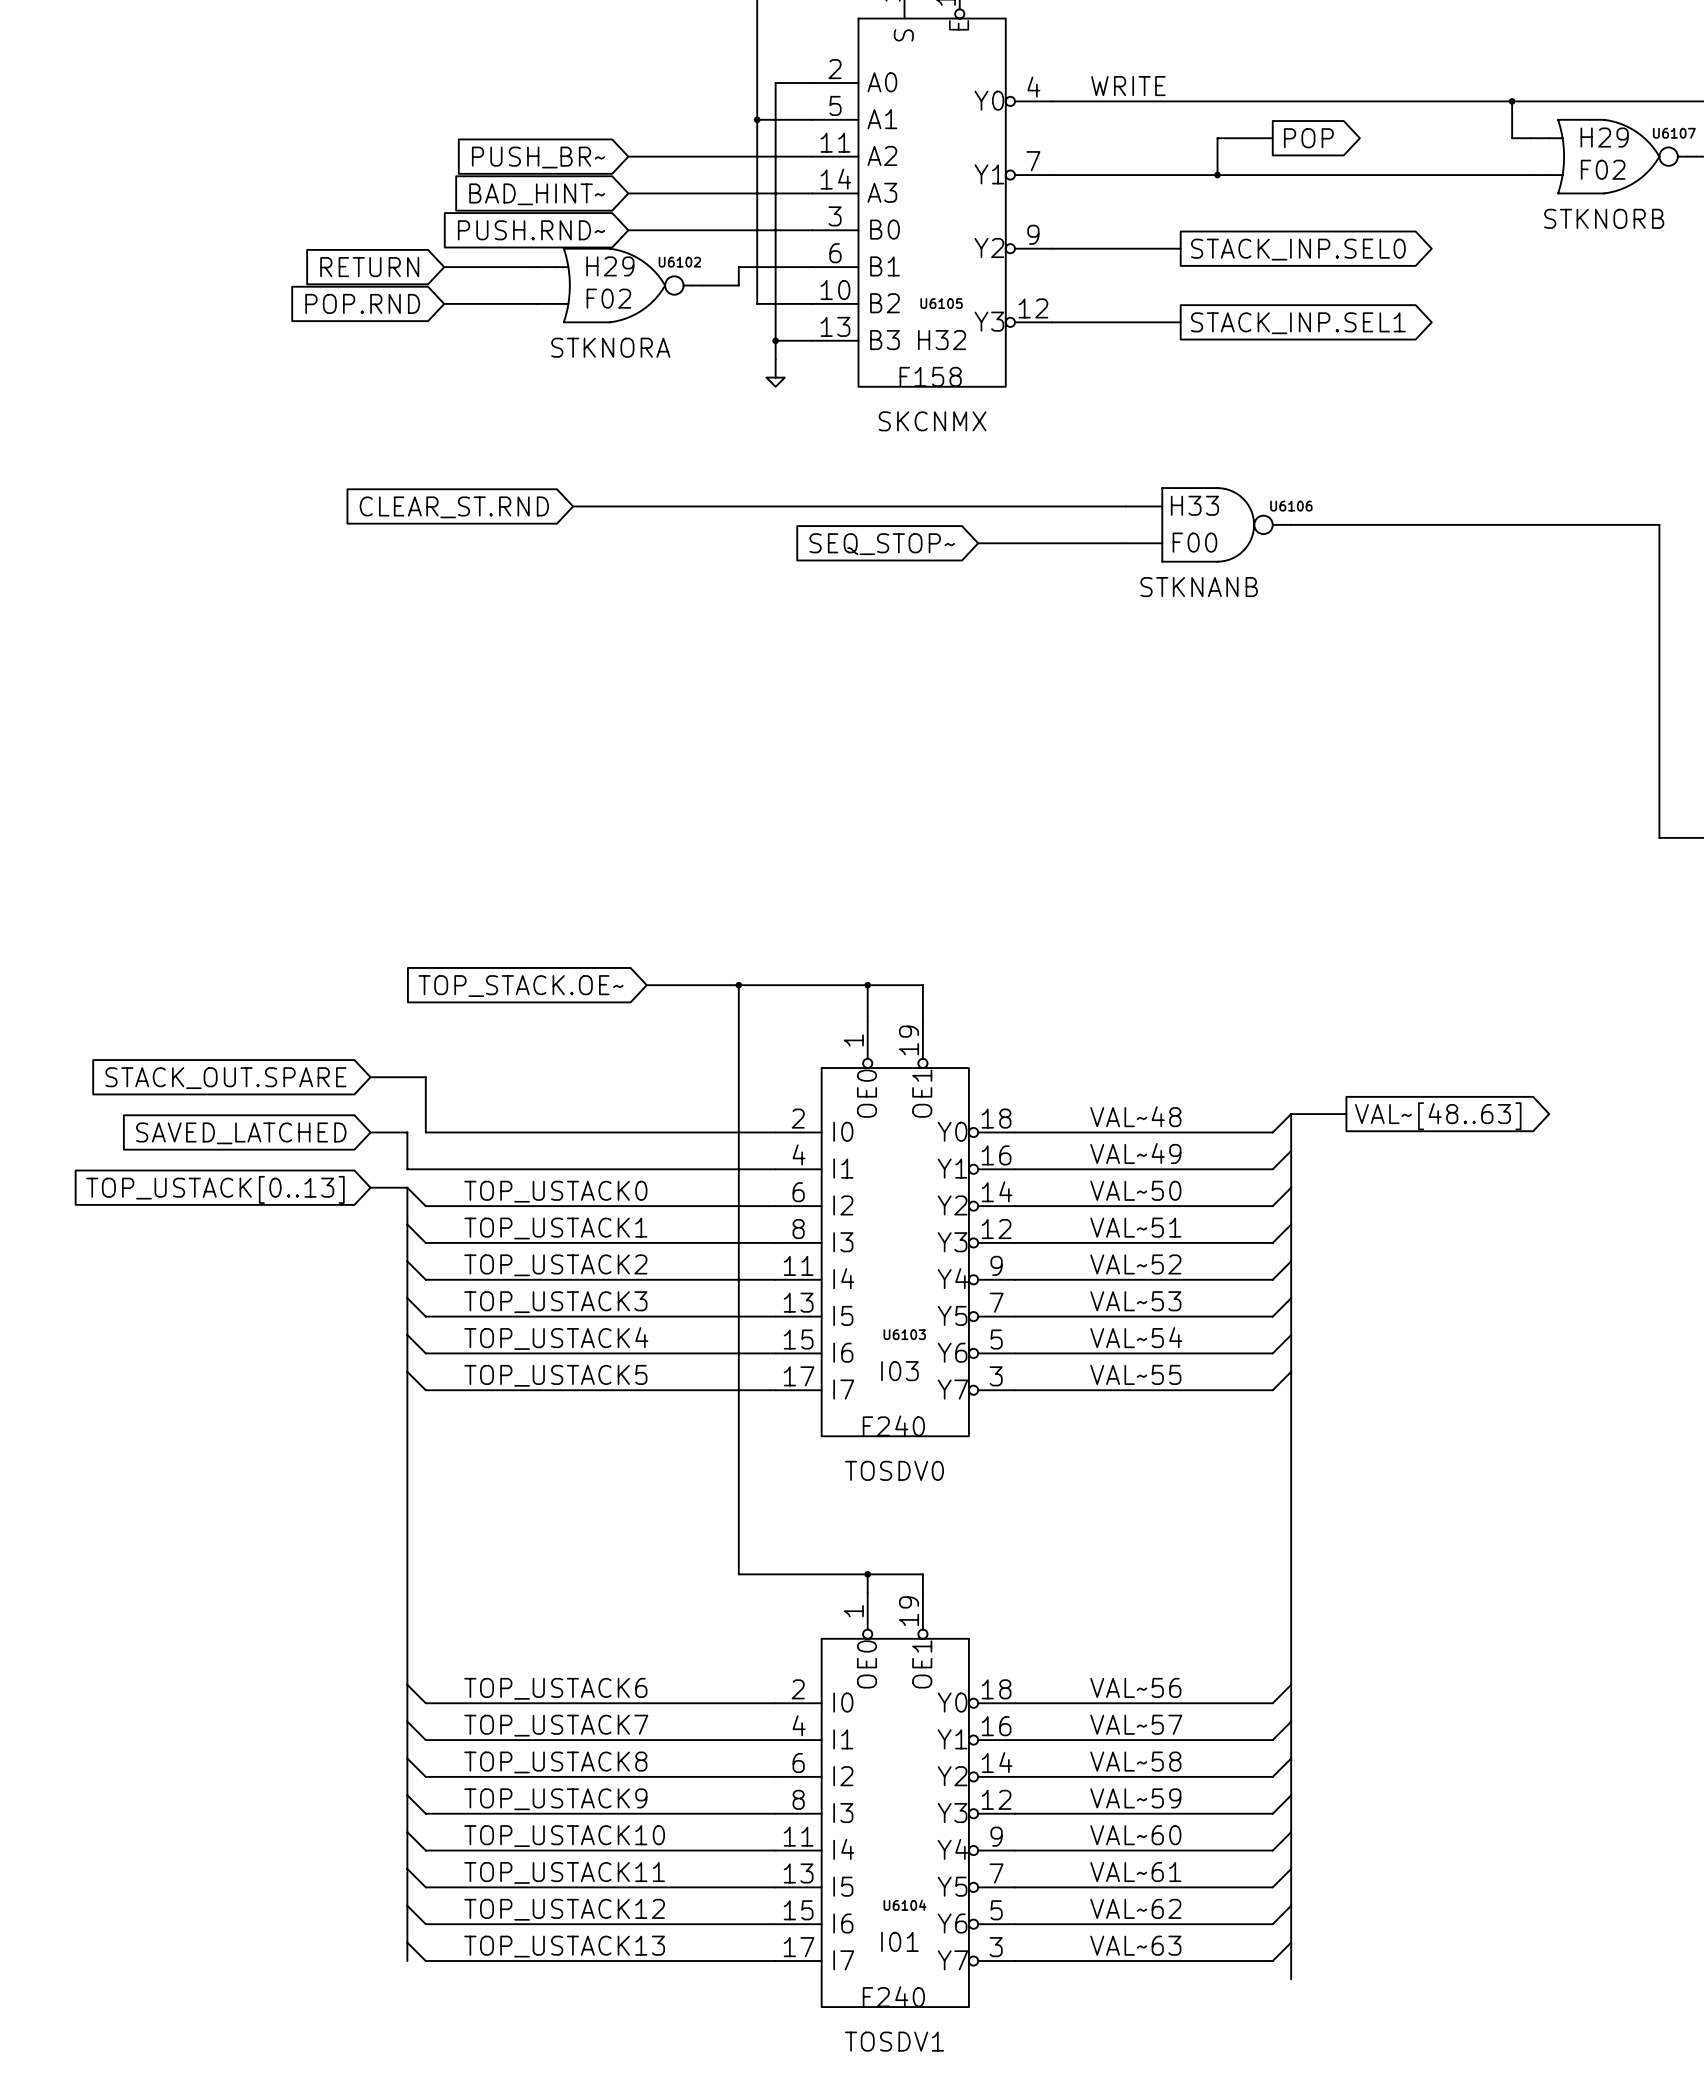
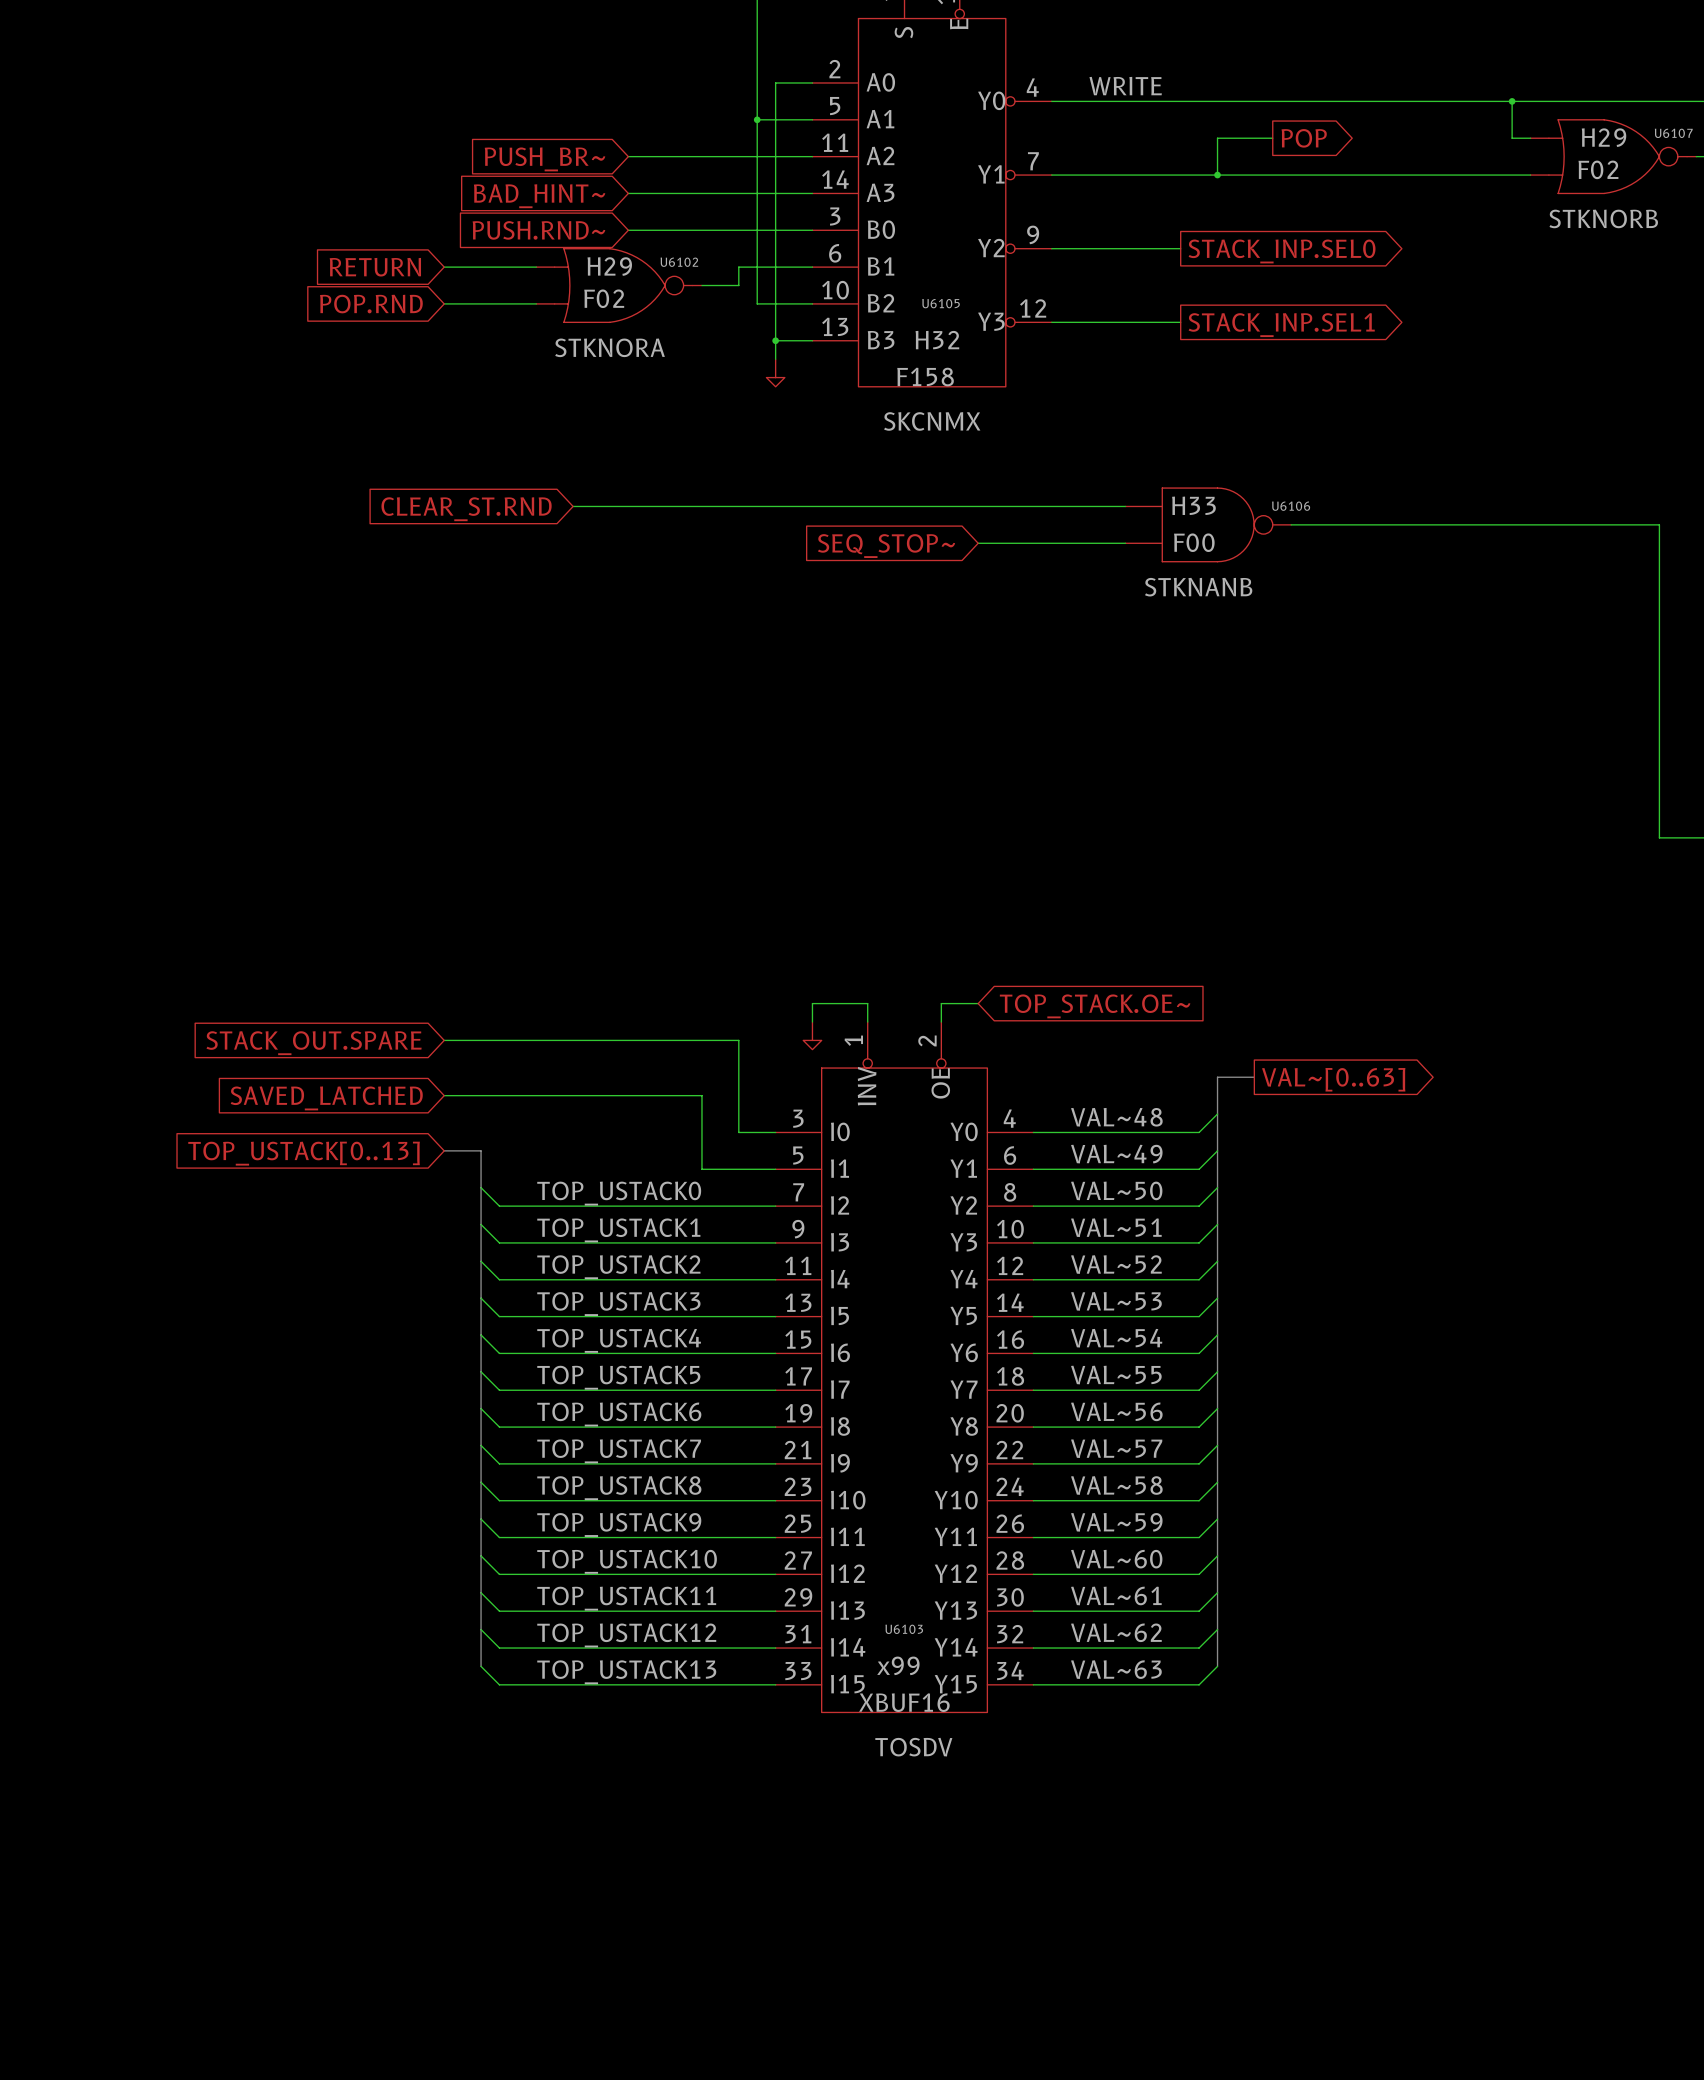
wire: (646, 985) (922, 985) (922, 1022) -> none
wire: (738, 985) (738, 1040) -> (444, 1040) (738, 1040)
junction: (738, 985) -> none
wire: (867, 985) (867, 1003) -> (812, 1022) (812, 1003) (867, 1003)
junction: (867, 985) -> none
global label: TOP_STACK.OE~ (520, 986) -> none
wire: none -> (978, 1003) (941, 1003) (941, 1022)
global label: none -> TOP_STACK.OE~ (1095, 1006)
U6103 symbol: [775, 1022, 1015, 1437] -> [775, 1022, 1034, 1713]
power symbol: none -> (812, 1036)
wire: (370, 1077) (425, 1077) (425, 1132) (738, 1132) (738, 1574) -> (481, 1555) (499, 1574) (738, 1574)
bus: none -> (1254, 1077) (1217, 1077) (1217, 1666)
global label position: STACK_OUT.SPARE (225, 1078) -> STACK_OUT.SPARE (314, 1043)
wire: (1291, 1114) (1272, 1132) (1199, 1132) -> (1217, 1114) (1199, 1132)
bus: (1346, 1114) (1291, 1114) (1291, 1979) -> none
label position: VAL~48 (1135, 1116) -> VAL~48 (1116, 1117)
global label: VAL~[48..63] (1438, 1116) -> VAL~[0..63] (1333, 1079)
wire: (370, 1132) (407, 1132) (407, 1169) (701, 1169) -> (444, 1095) (701, 1095) (701, 1169)
global label position: SAVED_LATCHED (241, 1133) -> SAVED_LATCHED (326, 1098)
bus: none -> (444, 1150) (481, 1150) (481, 1666)
wire: (1291, 1150) (1272, 1169) (1199, 1169) -> (1217, 1150) (1199, 1169)
label position: VAL~49 (1135, 1153) -> VAL~49 (1116, 1154)
bus: (370, 1187) (407, 1187) (407, 1961) -> none
wire: (407, 1187) (425, 1206) (499, 1206) -> (481, 1187) (499, 1206)
wire: (1291, 1187) (1272, 1206) (1199, 1206) -> (1217, 1187) (1199, 1206)
global label position: TOP_USTACK[0..13] (215, 1189) -> TOP_USTACK[0..13] (304, 1153)
label position: VAL~50 (1135, 1190) -> VAL~50 (1116, 1190)
label position: TOP_USTACK0 (555, 1191) -> TOP_USTACK0 (619, 1193)
wire: (407, 1224) (425, 1242) (499, 1242) -> (481, 1224) (499, 1242)
wire: (1291, 1224) (1272, 1242) (1199, 1242) -> (1217, 1224) (1199, 1242)
label position: VAL~51 (1135, 1227) -> VAL~51 (1116, 1227)
label position: TOP_USTACK1 (555, 1228) -> TOP_USTACK1 (618, 1230)
wire: (407, 1261) (425, 1279) (499, 1279) -> (481, 1261) (499, 1279)
wire: (1291, 1261) (1272, 1279) (1199, 1279) -> (1217, 1261) (1199, 1279)
label position: VAL~52 (1135, 1264) -> VAL~52 (1116, 1264)
label position: TOP_USTACK2 (555, 1265) -> TOP_USTACK2 (618, 1267)
wire: (407, 1298) (425, 1316) (499, 1316) -> (481, 1298) (499, 1316)
wire: (1291, 1298) (1272, 1316) (1199, 1316) -> (1217, 1298) (1199, 1316)
label position: VAL~53 (1135, 1301) -> VAL~53 (1116, 1301)
label position: TOP_USTACK3 (555, 1302) -> TOP_USTACK3 (618, 1304)
U6103 name position: U6103 (904, 1334) -> U6103 (904, 1629)
wire: (407, 1335) (425, 1353) (499, 1353) -> (481, 1335) (499, 1353)
wire: (1291, 1335) (1272, 1353) (1199, 1353) -> (1217, 1335) (1199, 1353)
label position: VAL~54 (1136, 1337) -> VAL~54 (1116, 1338)
label position: TOP_USTACK4 (556, 1338) -> TOP_USTACK4 (619, 1340)
wire: (407, 1371) (425, 1390) (499, 1390) -> (481, 1371) (499, 1390)
U6103 text: I03 (899, 1371) -> x99 (898, 1665)
wire: (1291, 1371) (1272, 1390) (1199, 1390) -> (1217, 1371) (1199, 1390)
label position: VAL~55 (1135, 1374) -> VAL~55 (1116, 1375)
label position: TOP_USTACK5 (555, 1375) -> TOP_USTACK5 (618, 1377)
wire: none -> (481, 1408) (499, 1427) (775, 1427)
wire: none -> (1217, 1408) (1199, 1427) (1033, 1427)
label: none -> VAL~56 (1116, 1411)
label: none -> TOP_USTACK6 (619, 1414)
U6103 value: F240 (893, 1425) -> XBUF16 (904, 1702)
wire: none -> (481, 1445) (499, 1463) (775, 1463)
wire: none -> (1217, 1445) (1199, 1463) (1033, 1463)
label: none -> VAL~57 (1116, 1448)
label: none -> TOP_USTACK7 (619, 1451)
U6103 text: TOSDV0 (894, 1470) -> TOSDV (913, 1747)
wire: none -> (481, 1482) (499, 1500) (775, 1500)
wire: none -> (1217, 1482) (1199, 1500) (1033, 1500)
label: none -> VAL~58 (1116, 1485)
label: none -> TOP_USTACK8 (619, 1488)
wire: none -> (481, 1519) (499, 1537) (775, 1537)
wire: none -> (1217, 1519) (1199, 1537) (1033, 1537)
label: none -> VAL~59 (1116, 1522)
label: none -> TOP_USTACK9 (619, 1524)
wire: none -> (1217, 1555) (1199, 1574) (1033, 1574)
label: none -> TOP_USTACK10 (627, 1561)
label: none -> VAL~60 (1116, 1559)
wire: (775, 1574) (922, 1574) (922, 1592) -> none
wire: (867, 1574) (867, 1592) -> none
junction: (867, 1574) -> none
wire: none -> (481, 1592) (499, 1611) (775, 1611)
wire: none -> (1217, 1592) (1199, 1611) (1033, 1611)
label: none -> VAL~61 (1116, 1595)
label: none -> TOP_USTACK11 (626, 1598)
wire: none -> (481, 1629) (499, 1648) (775, 1648)
wire: none -> (1217, 1629) (1199, 1648) (1033, 1648)
label: none -> VAL~62 (1116, 1632)
label: none -> TOP_USTACK12 (626, 1635)
wire: none -> (481, 1666) (499, 1684) (775, 1684)
wire: none -> (1217, 1666) (1199, 1684) (1033, 1684)
wire: (407, 1684) (425, 1703) (775, 1703) -> none
wire: (1291, 1684) (1272, 1703) (1014, 1703) -> none
label: VAL~56 (1135, 1687) -> VAL~63 (1116, 1669)
label: TOP_USTACK6 (555, 1688) -> TOP_USTACK13 (626, 1672)
wire: (407, 1721) (425, 1740) (775, 1740) -> none
wire: (1291, 1721) (1272, 1740) (1014, 1740) -> none
label: VAL~57 (1136, 1724) -> none
label: TOP_USTACK7 (556, 1725) -> none
wire: (407, 1758) (425, 1776) (775, 1776) -> none
wire: (1291, 1758) (1272, 1776) (1014, 1776) -> none
label: VAL~58 (1135, 1761) -> none
label: TOP_USTACK8 (555, 1762) -> none
wire: (407, 1795) (425, 1813) (775, 1813) -> none
wire: (1291, 1795) (1272, 1813) (1014, 1813) -> none
label: VAL~59 (1135, 1798) -> none
label: TOP_USTACK9 (555, 1799) -> none
U6104: F240 (895, 1799) -> none
wire: (407, 1832) (425, 1850) (775, 1850) -> none
wire: (1291, 1832) (1272, 1850) (1014, 1850) -> none
label: VAL~60 (1135, 1835) -> none
label: TOP_USTACK10 (564, 1836) -> none
wire: (407, 1868) (425, 1887) (775, 1887) -> none
wire: (1291, 1868) (1272, 1887) (1014, 1887) -> none
label: TOP_USTACK11 (564, 1872) -> none
label: VAL~61 (1135, 1872) -> none
wire: (407, 1905) (425, 1924) (775, 1924) -> none
wire: (1291, 1905) (1272, 1924) (1014, 1924) -> none
label: VAL~62 (1135, 1908) -> none
label: TOP_USTACK12 (564, 1909) -> none
wire: (407, 1942) (425, 1961) (775, 1961) -> none
wire: (1291, 1942) (1272, 1961) (1014, 1961) -> none
label: VAL~63 (1135, 1945) -> none
label: TOP_USTACK13 (564, 1946) -> none

